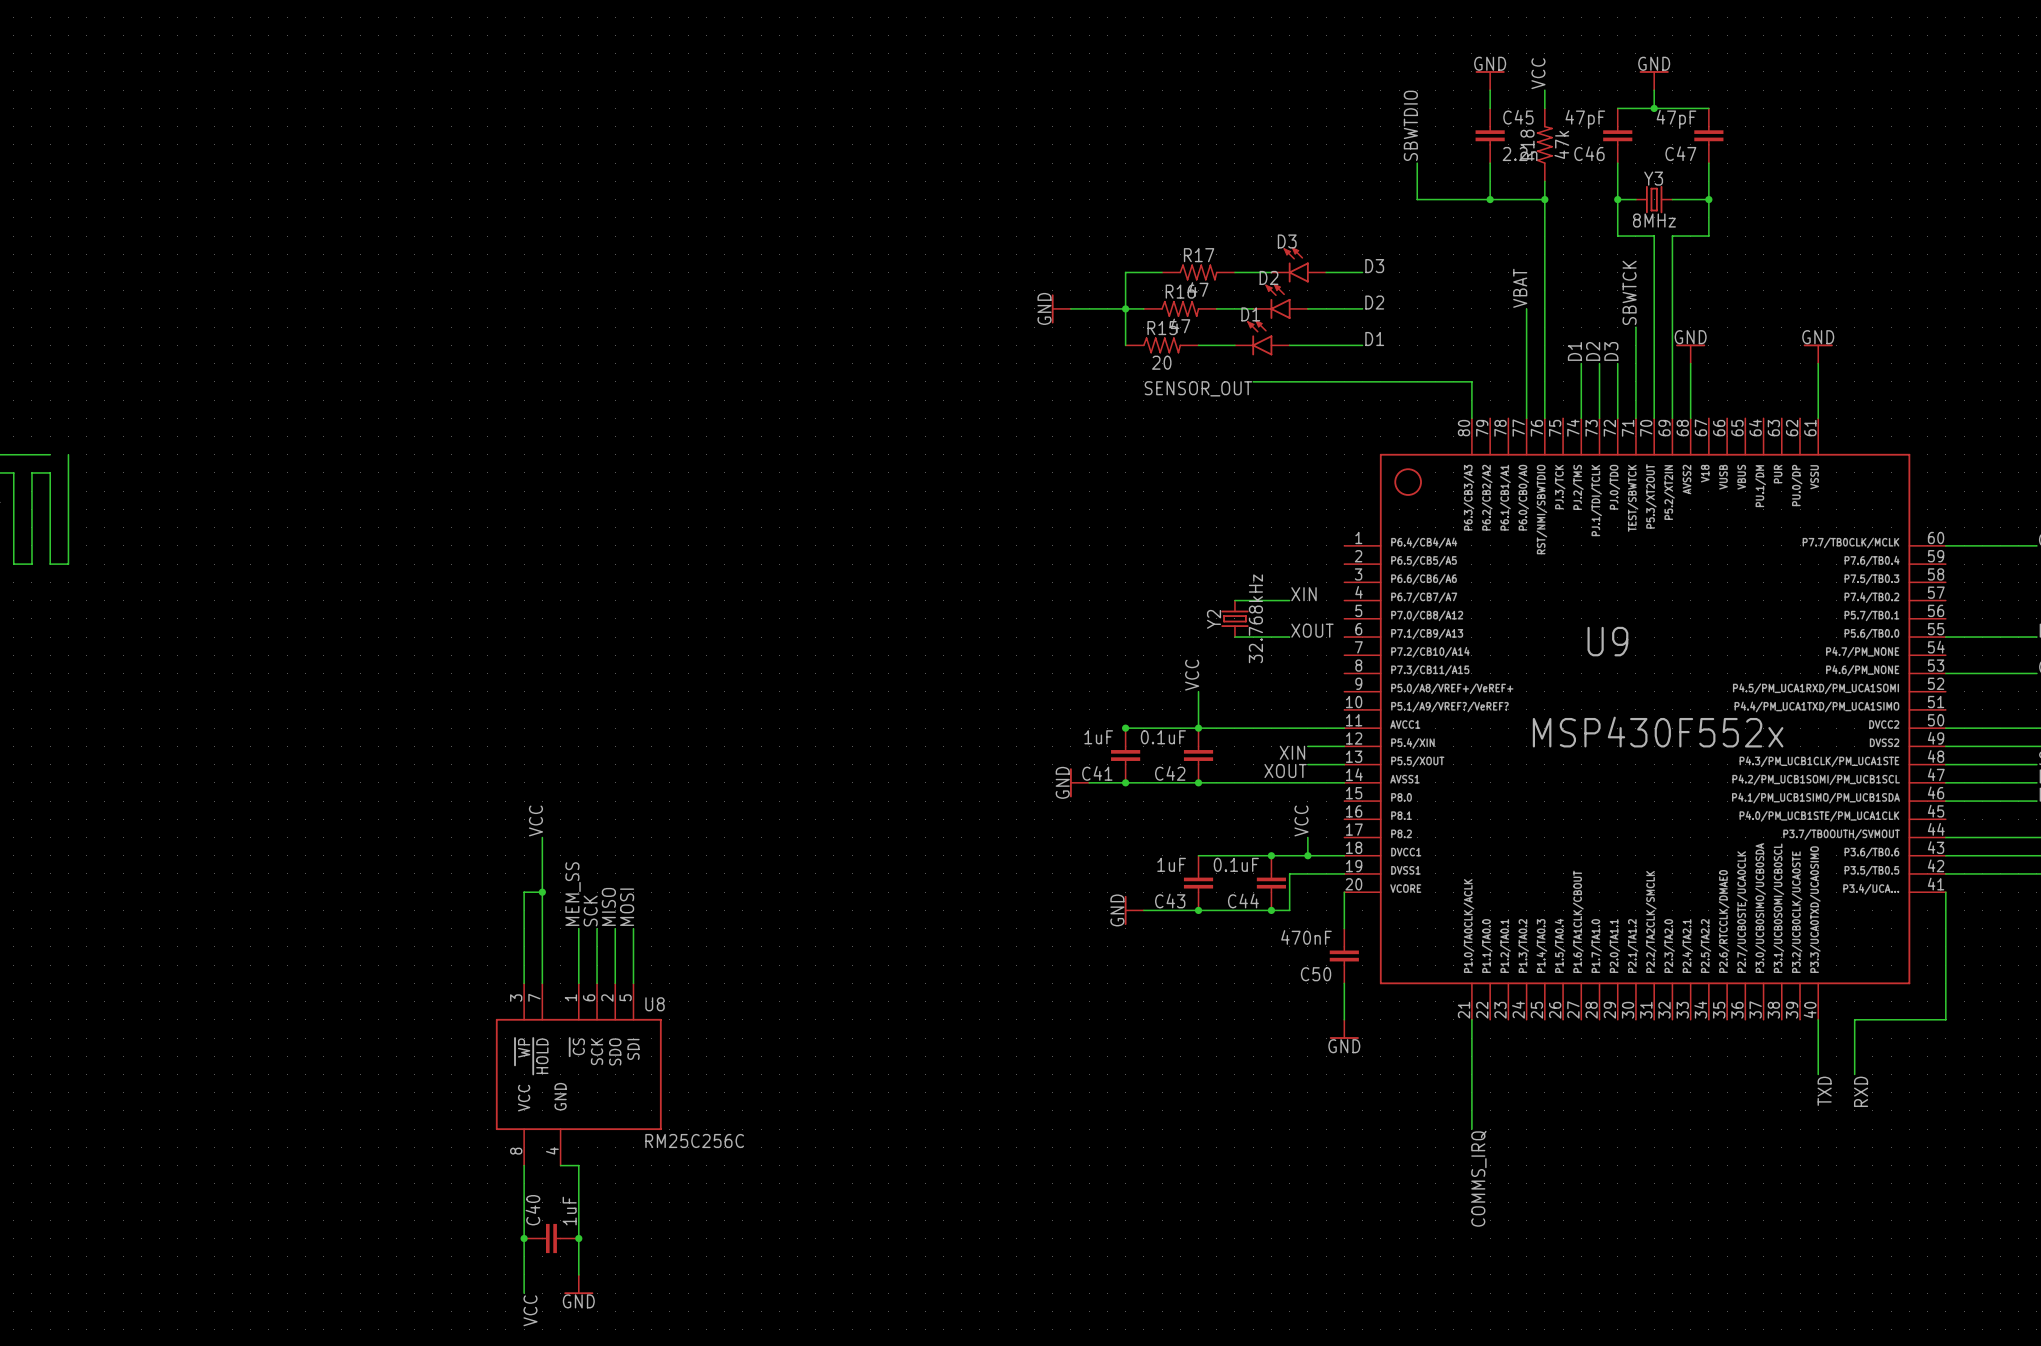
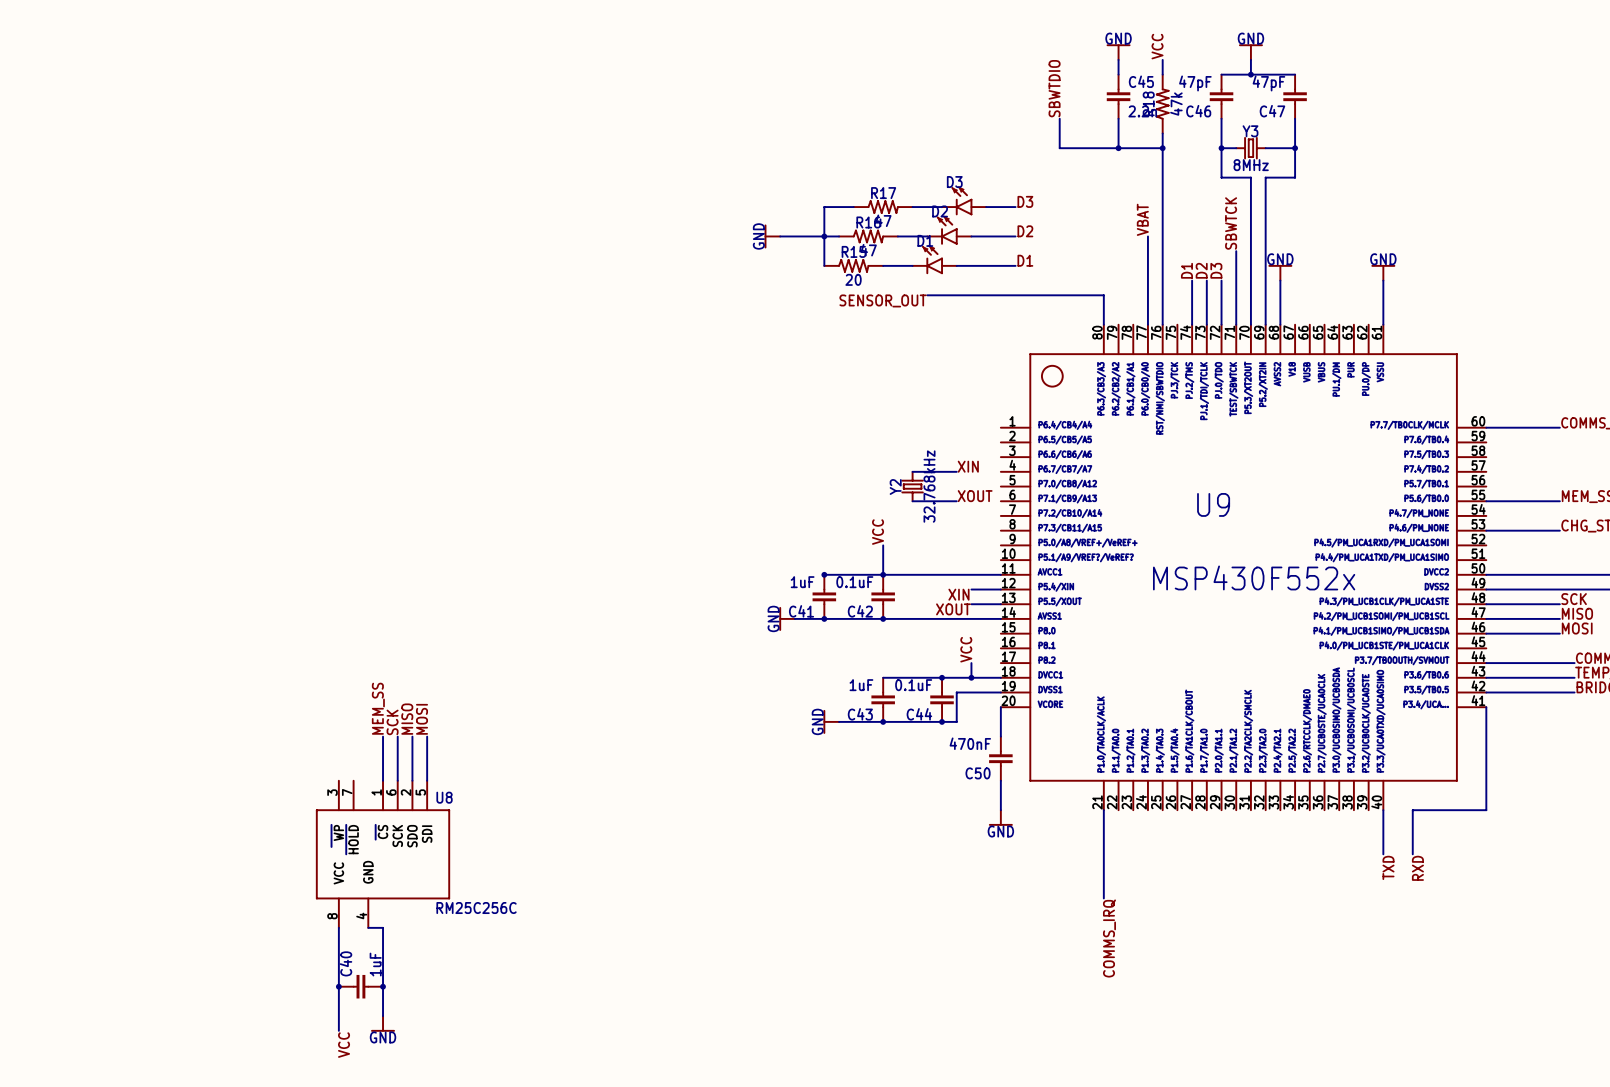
label: VCC (535, 820) -> none
wire: (542, 837) (542, 983) -> none
wire: (542, 892) (524, 892) (524, 983) -> none
junction: (542, 892) -> none

